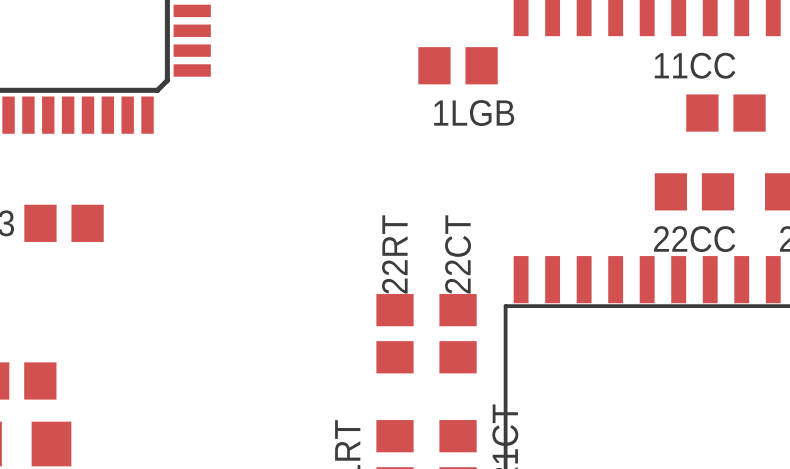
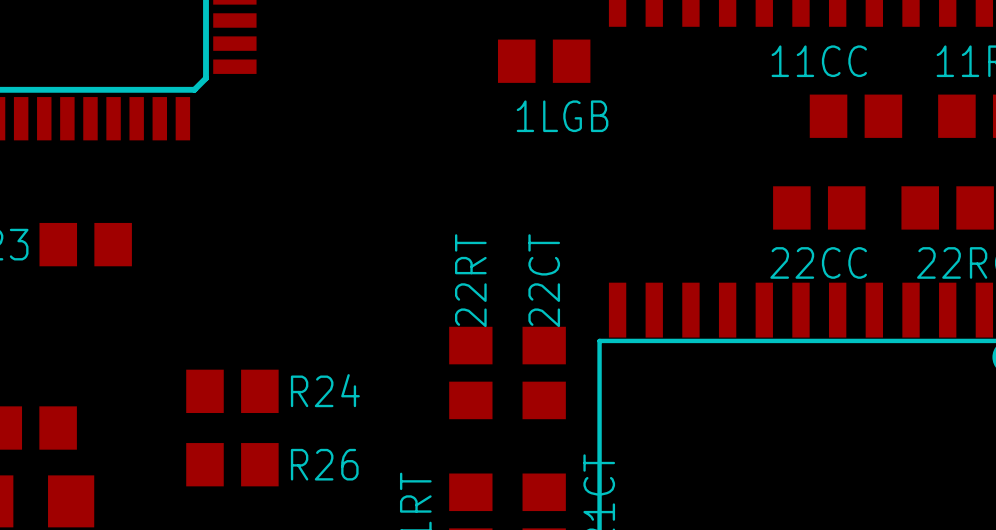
R24: none -> (232, 391)
R26: none -> (232, 464)

